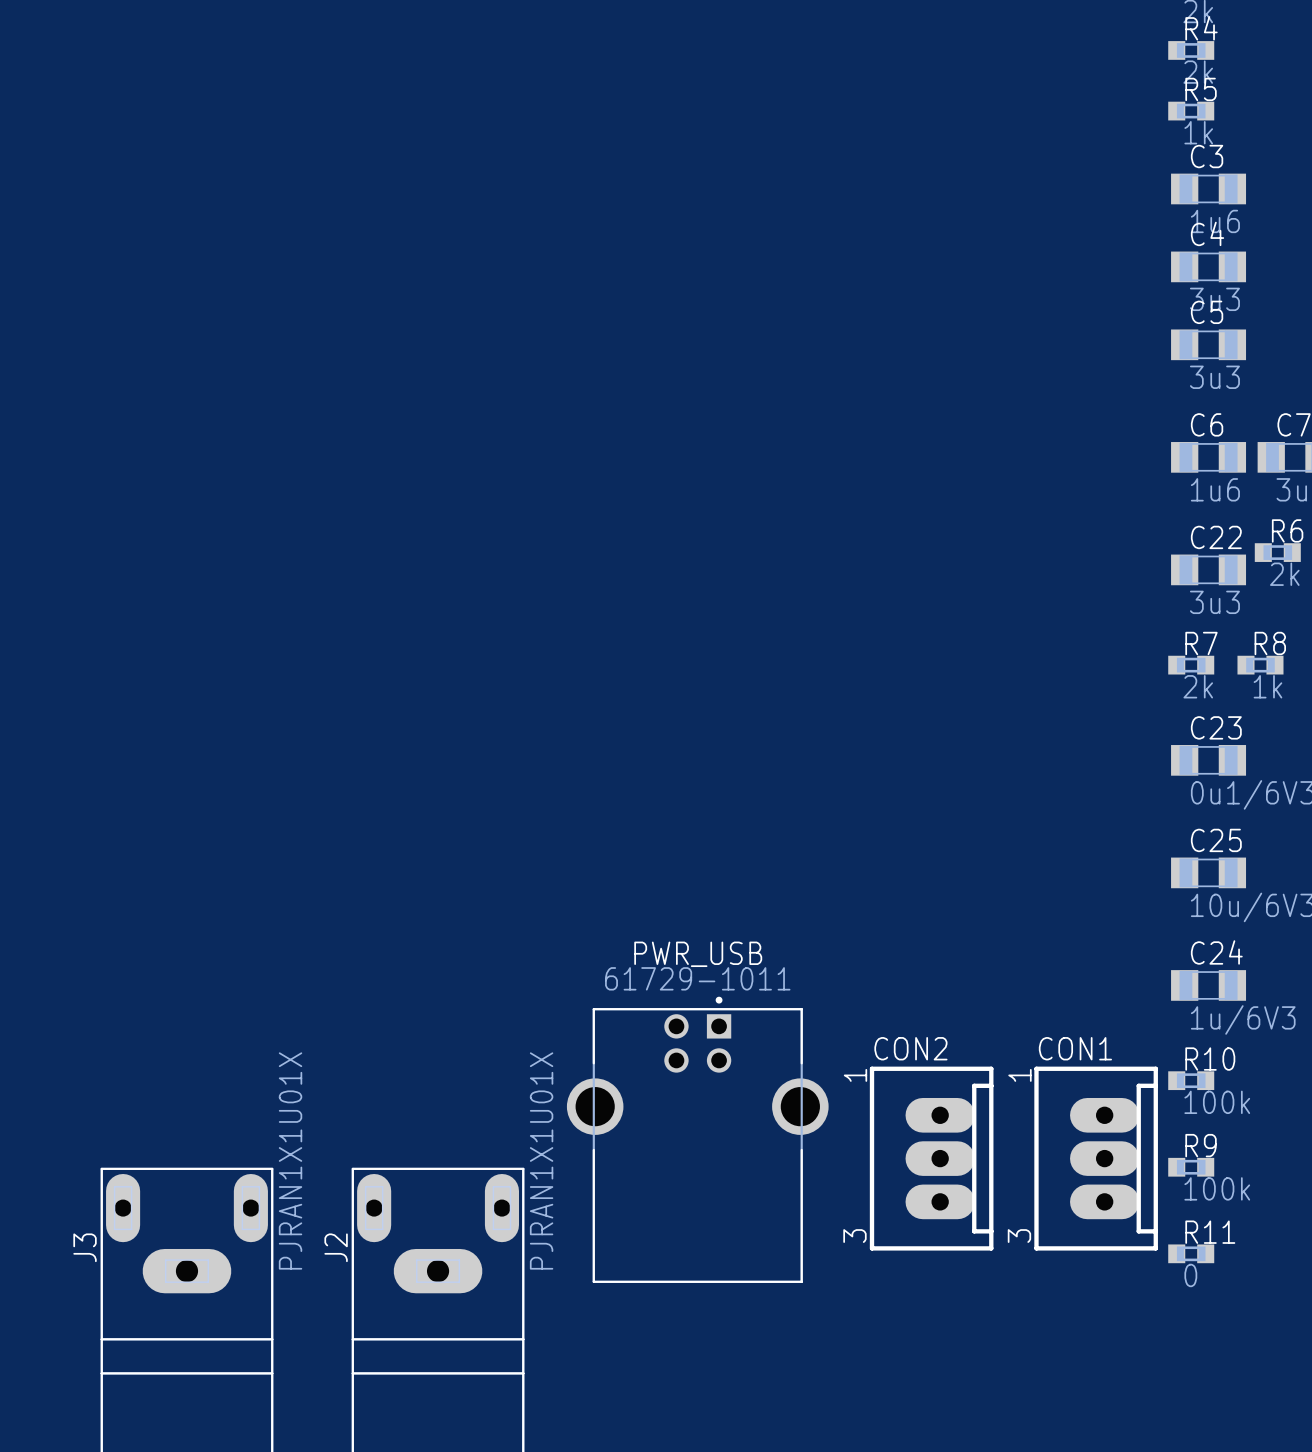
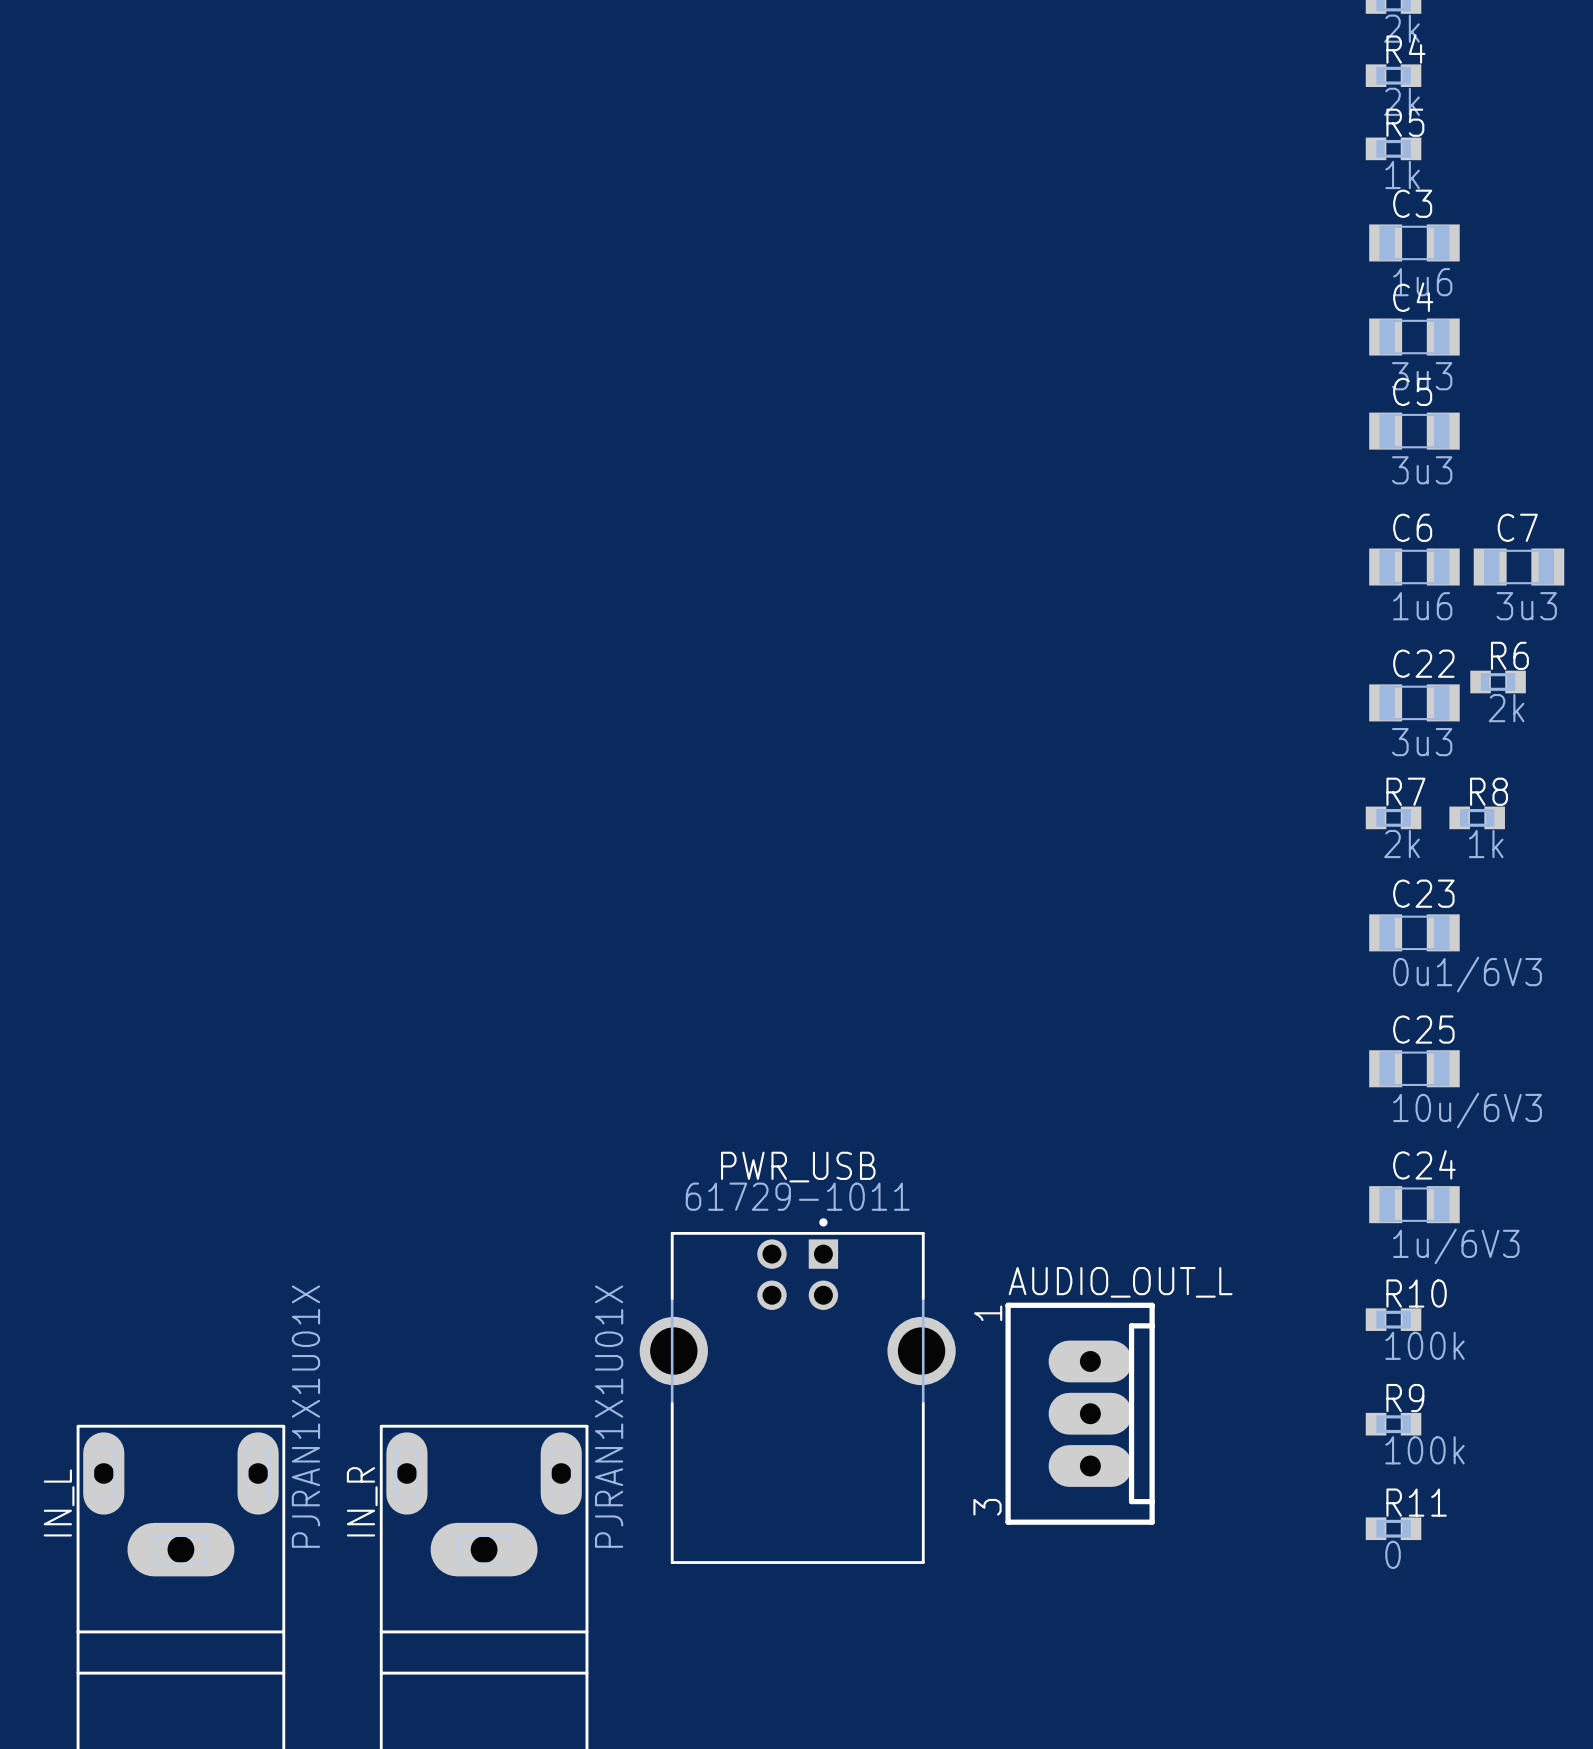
CON2 name: CON2 (910, 1048) -> AUDIO_OUT_L (1120, 1282)
CON1: (1096, 1158) -> none
J3 name: J3 (85, 1247) -> IN_L (59, 1502)
J2 name: J2 (336, 1247) -> IN_R (362, 1501)

